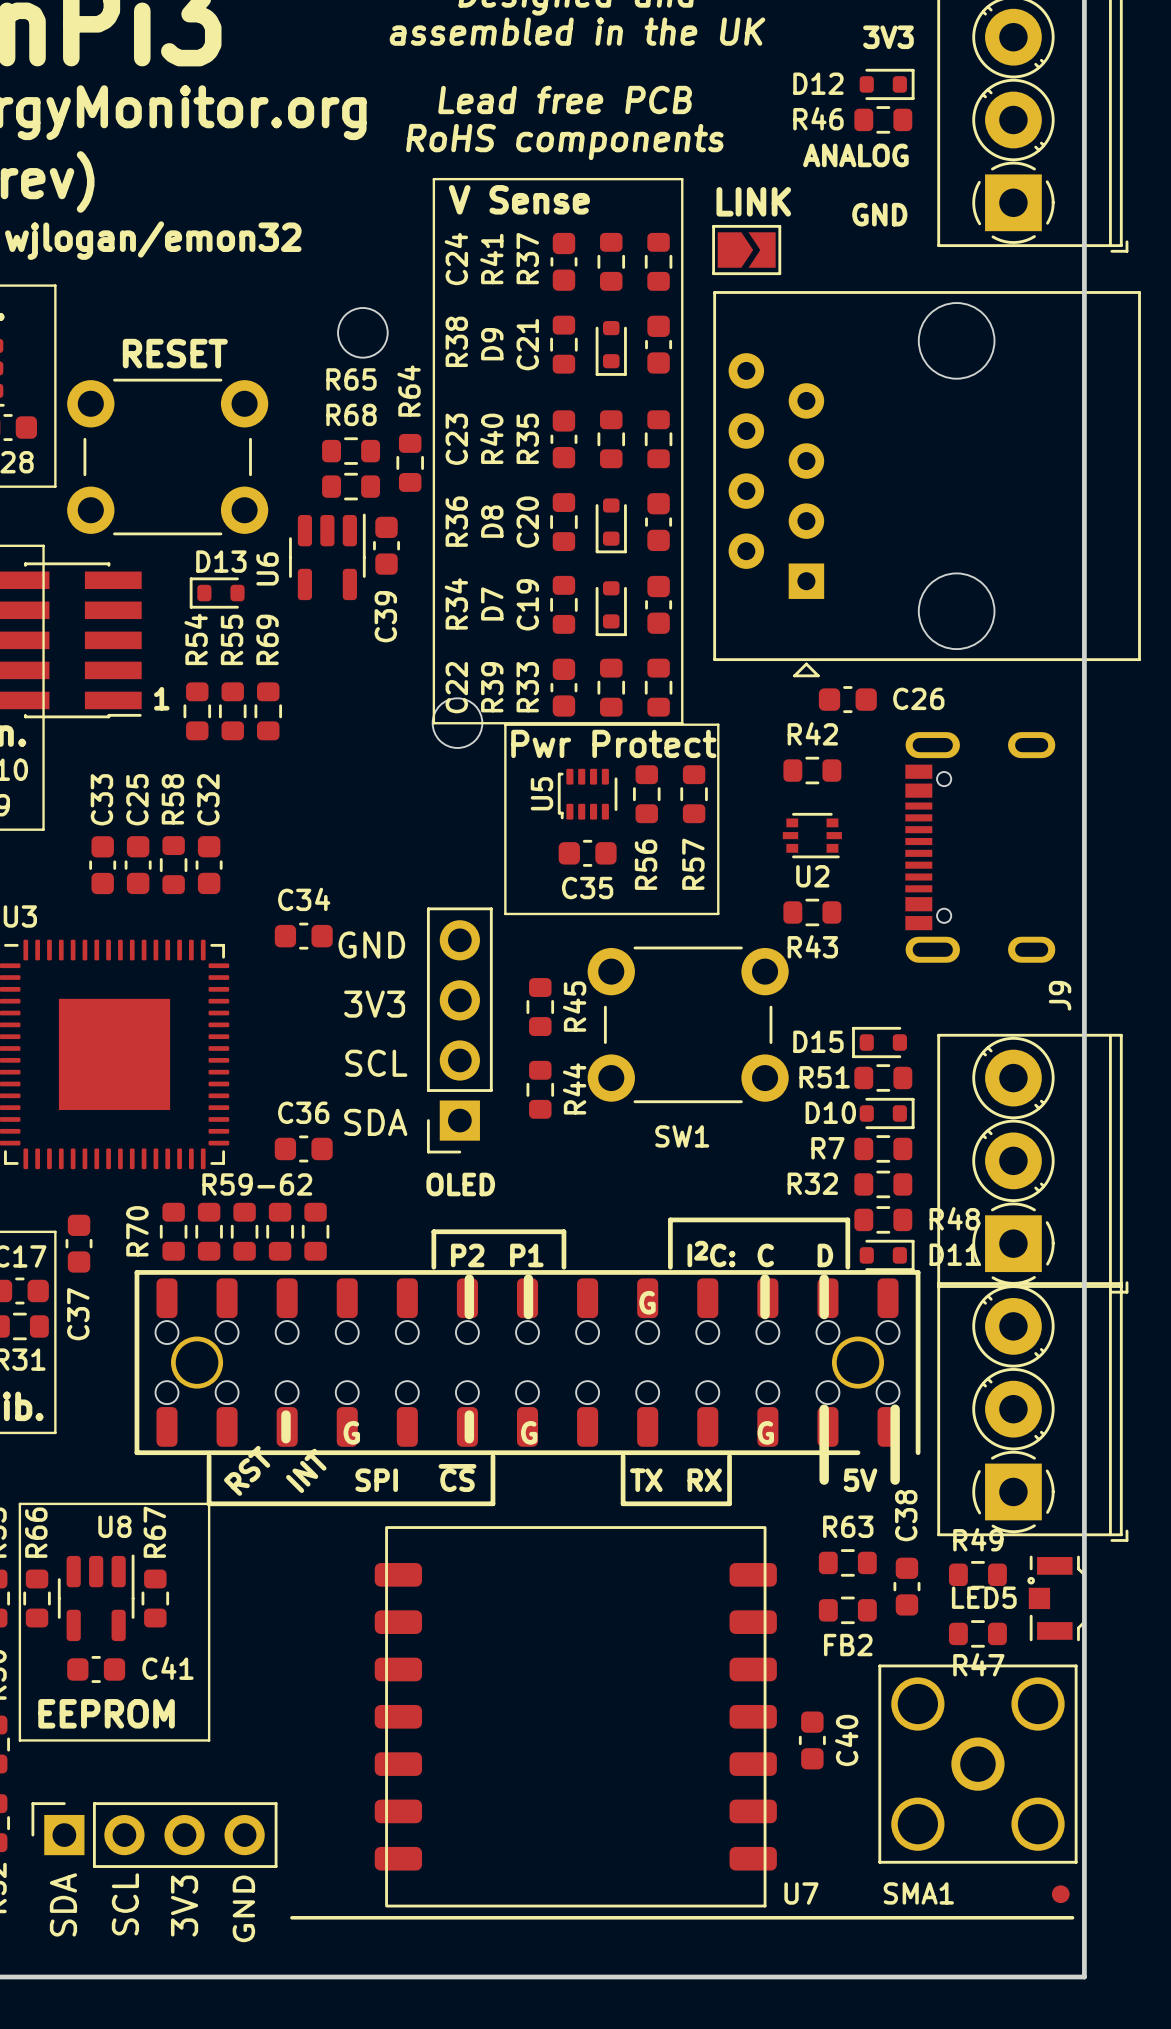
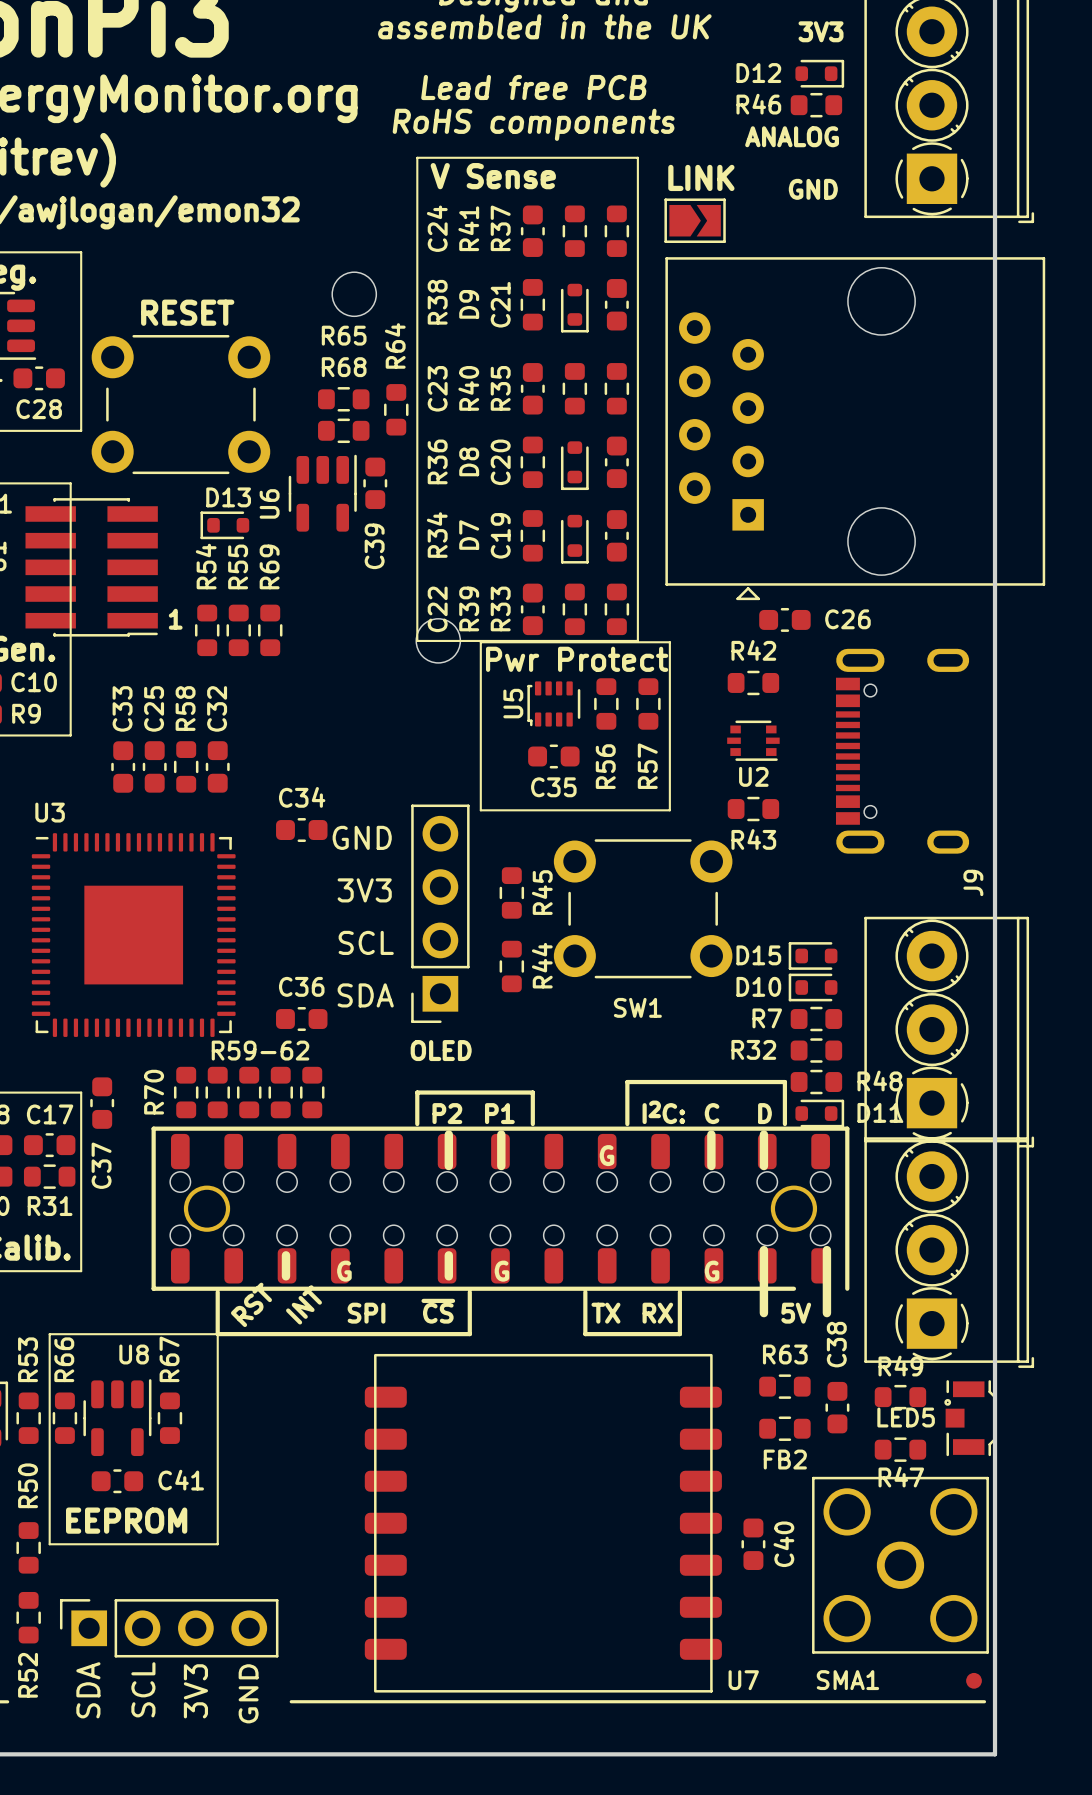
D15 position: (879, 1042) -> (813, 955)
R51: (883, 1077) -> none
D10 rotation: 0° (887, 1113) -> 180° (813, 987)

